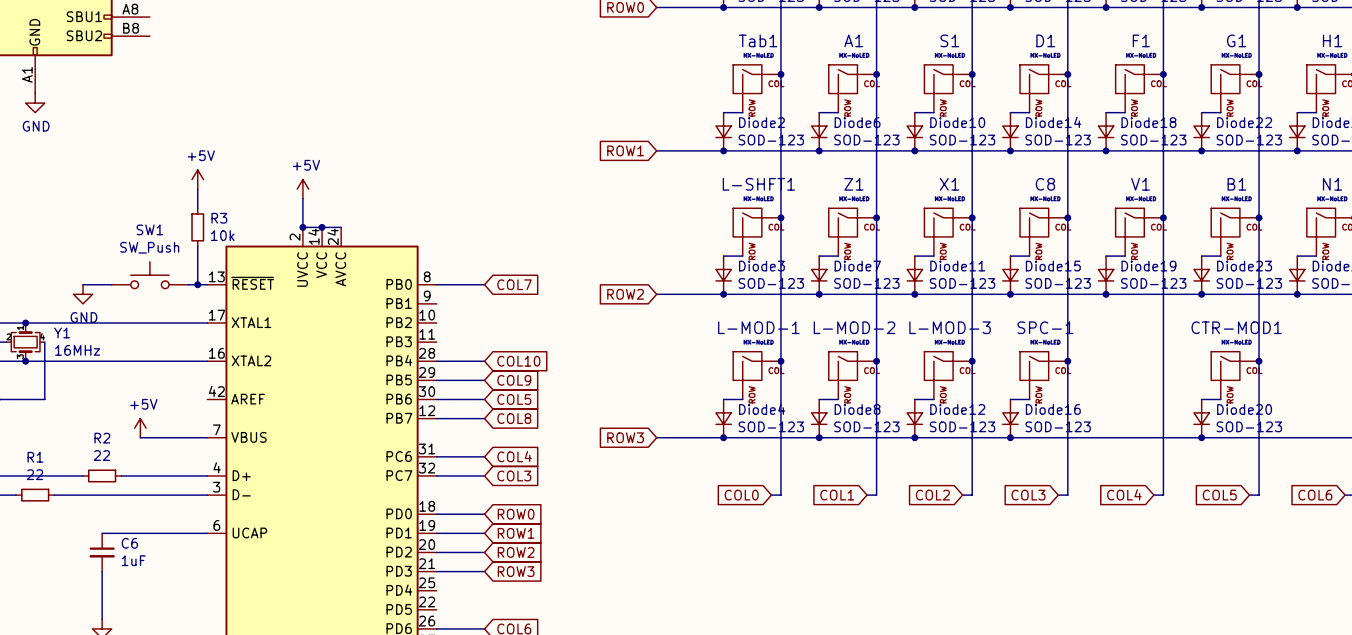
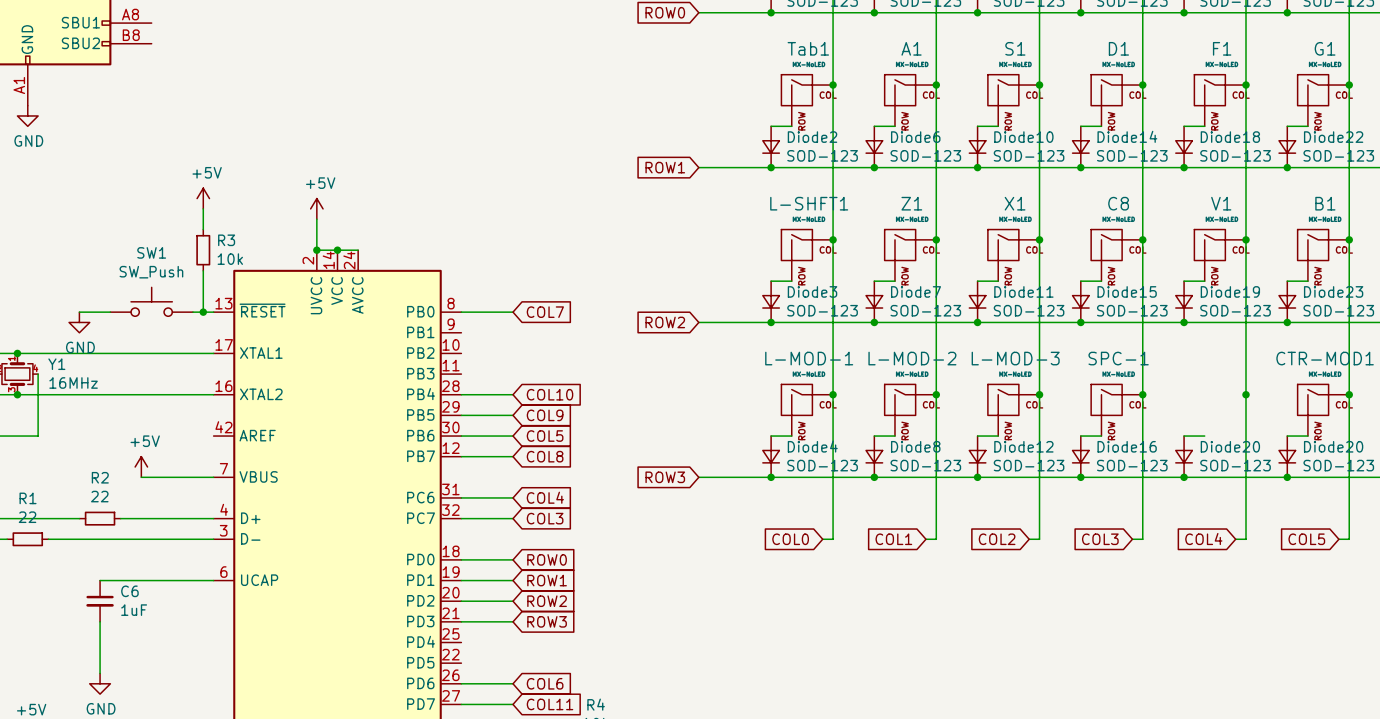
junction: none -> (1246, 394)
wire: none -> (1184, 436) (1204, 436)
Diode20: none -> SOD-123 (1184, 456)
junction: none -> (1184, 477)

